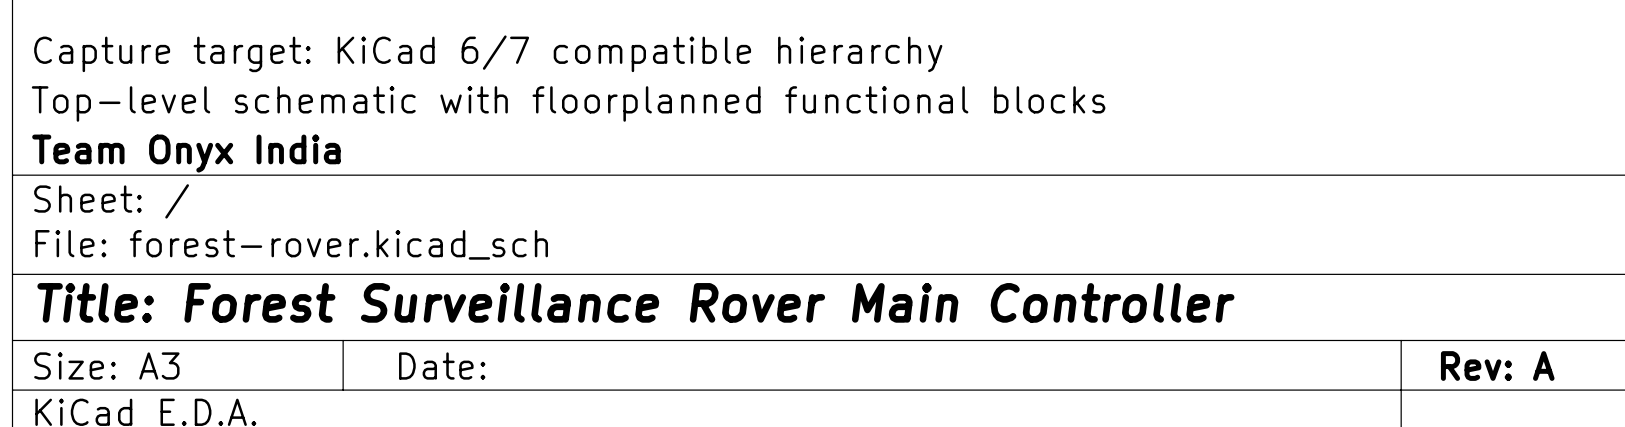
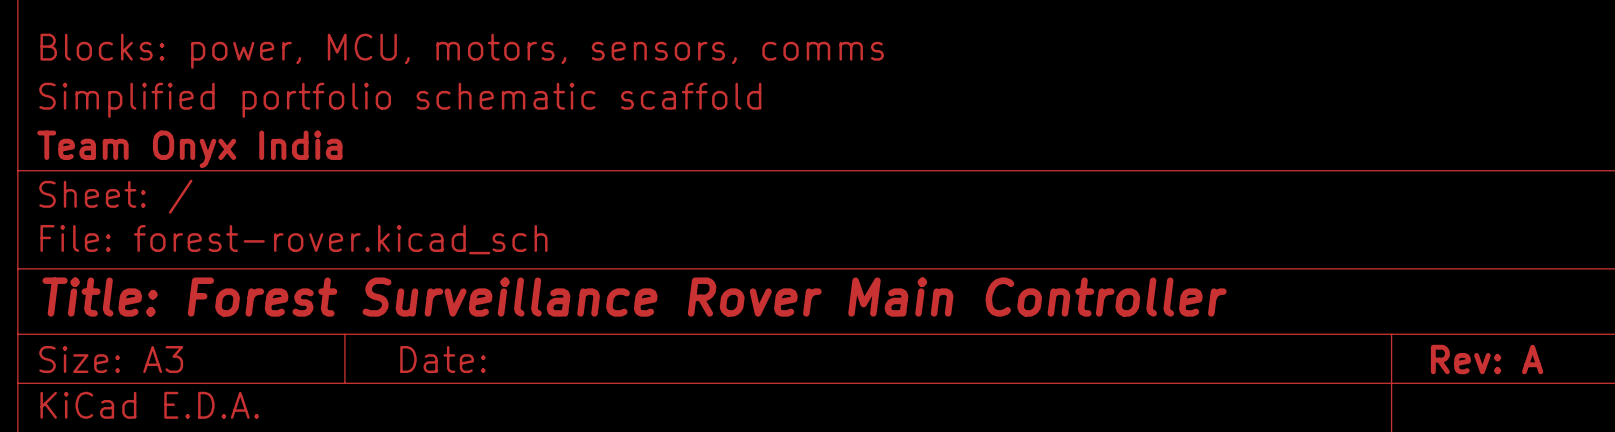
title block: Capture target: KiCad 6/7 compatible hierarchy (488, 53) -> Blocks: power, MCU, motors, sensors, comms (462, 51)
title block: Top-level schematic with floorplanned functional blocks (568, 103) -> Simplified portfolio schematic scaffold (400, 100)

